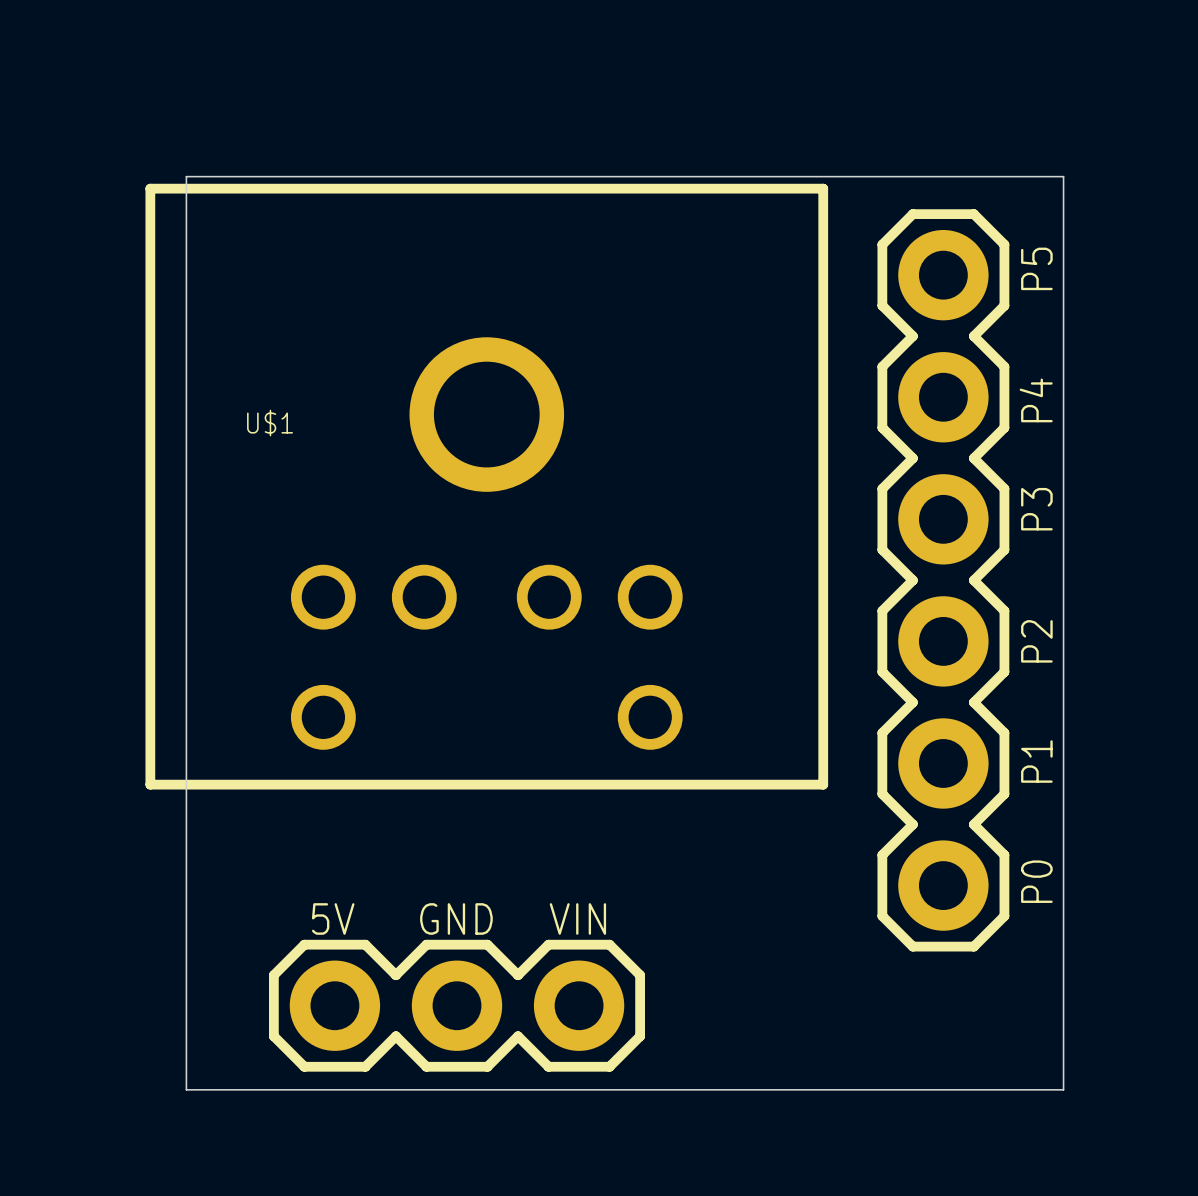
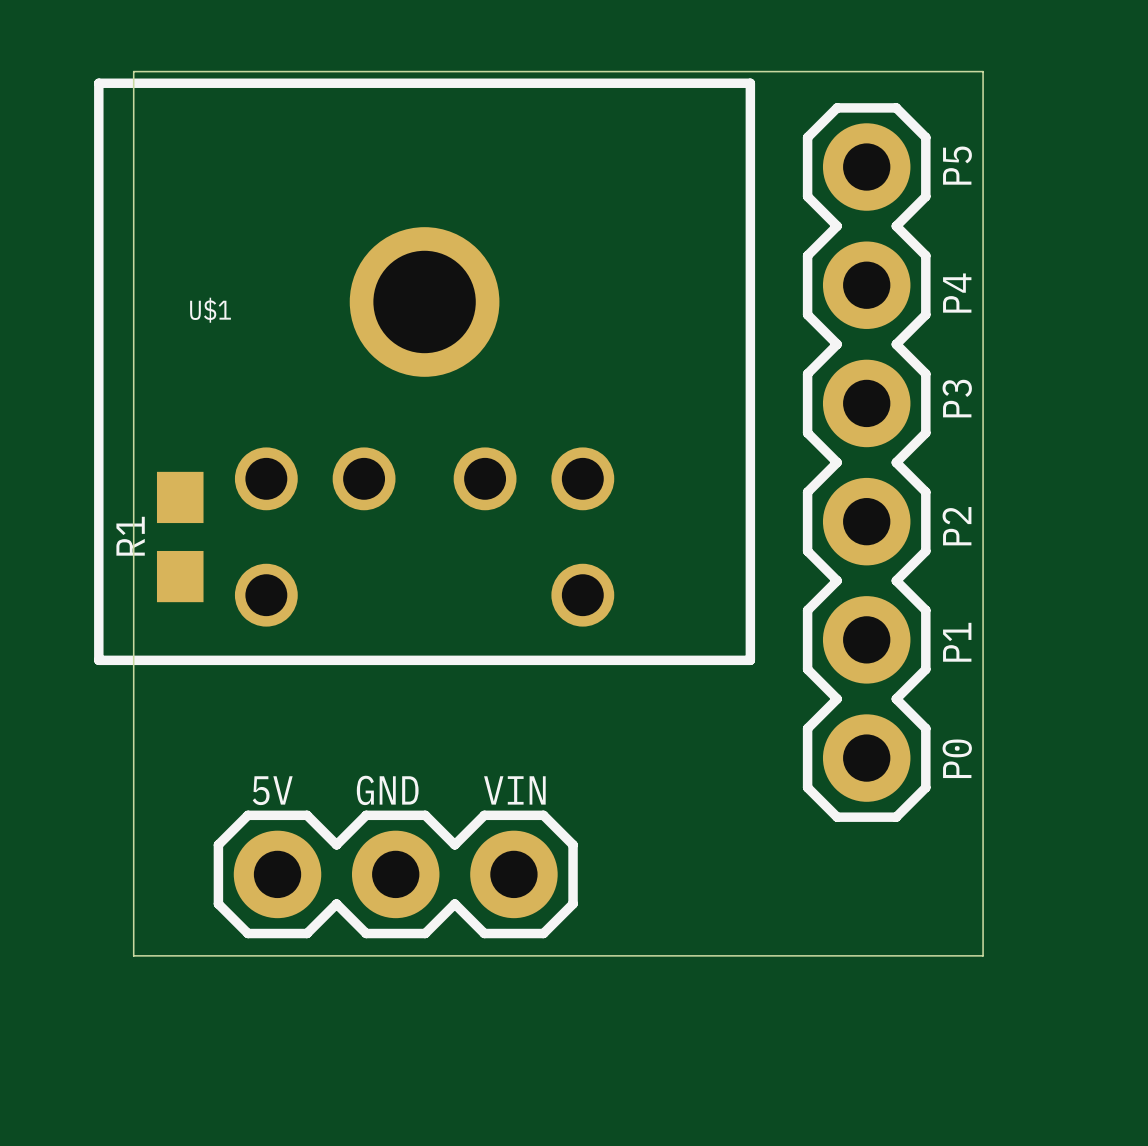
R1: none -> (180, 537)

